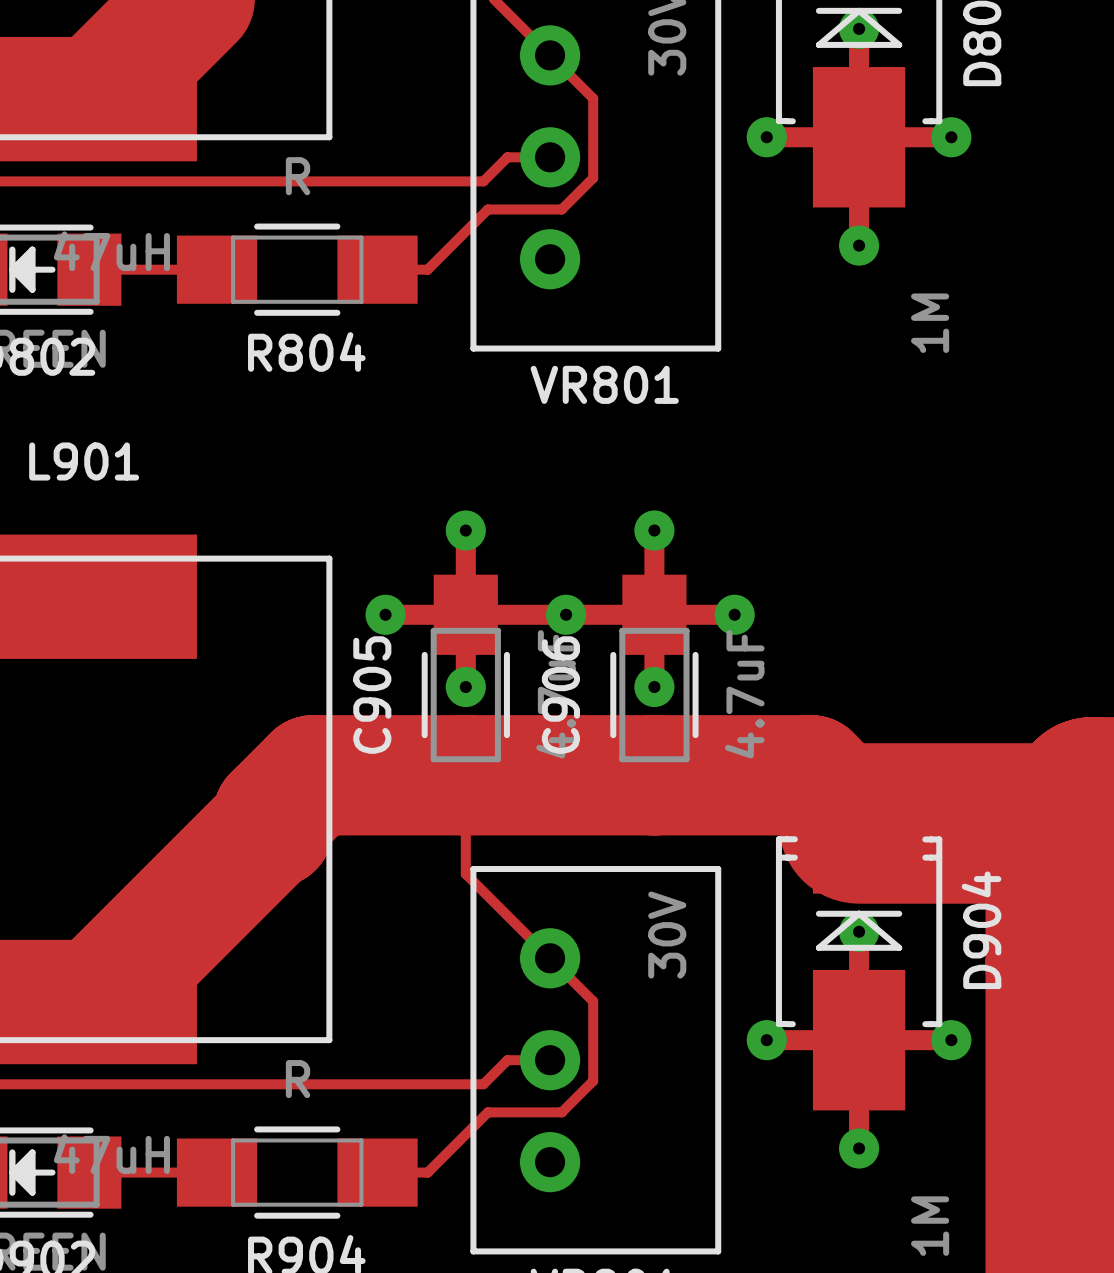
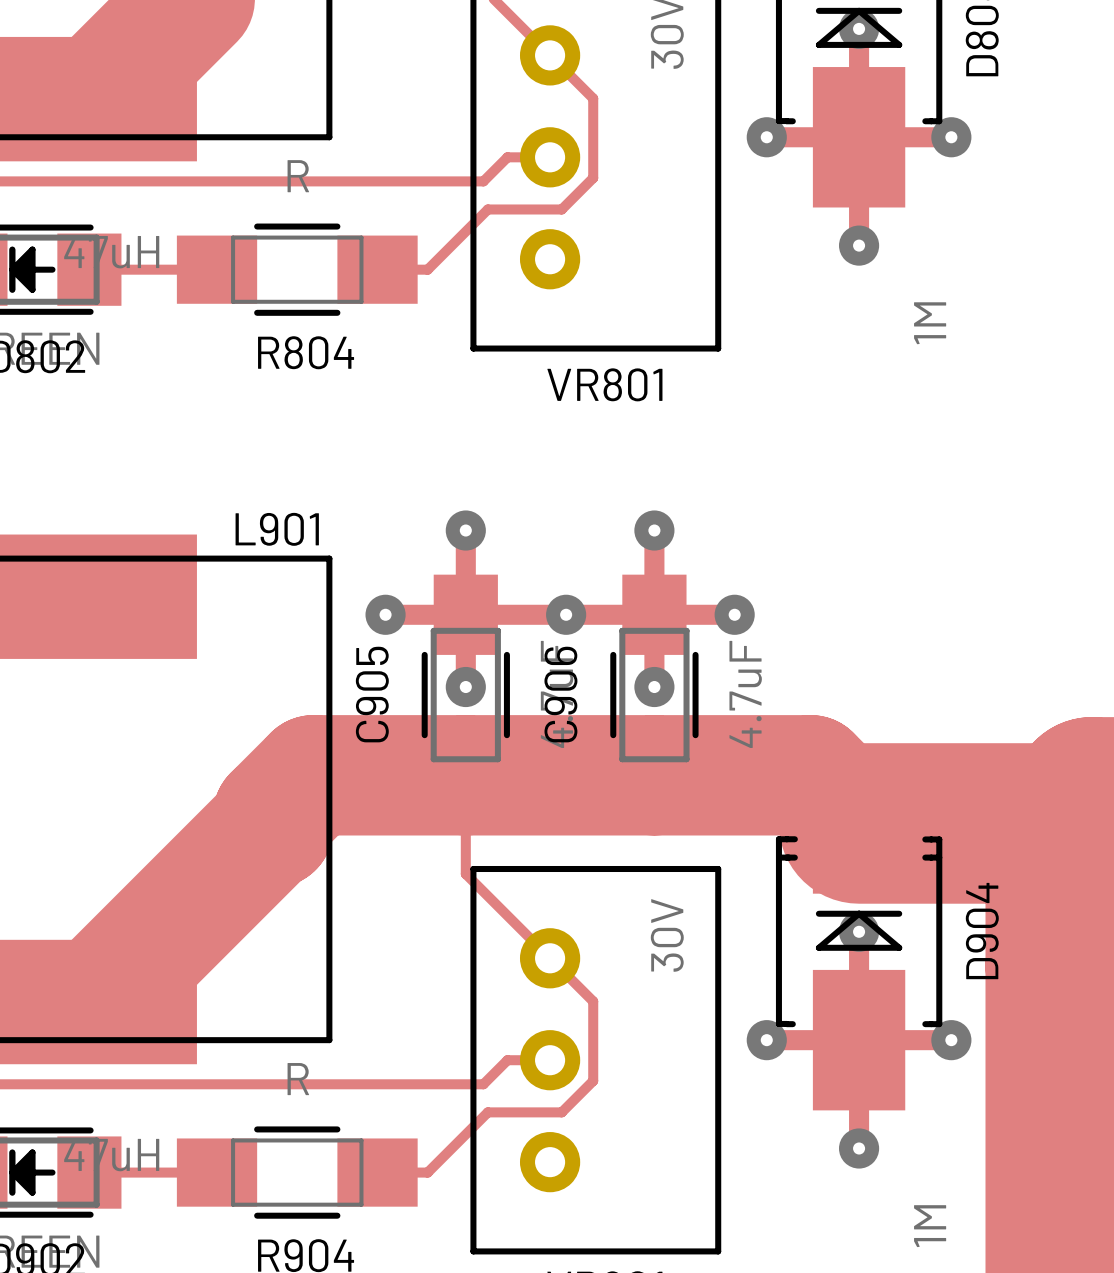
L901 name position: L901 (84, 461) -> L901 (277, 529)

